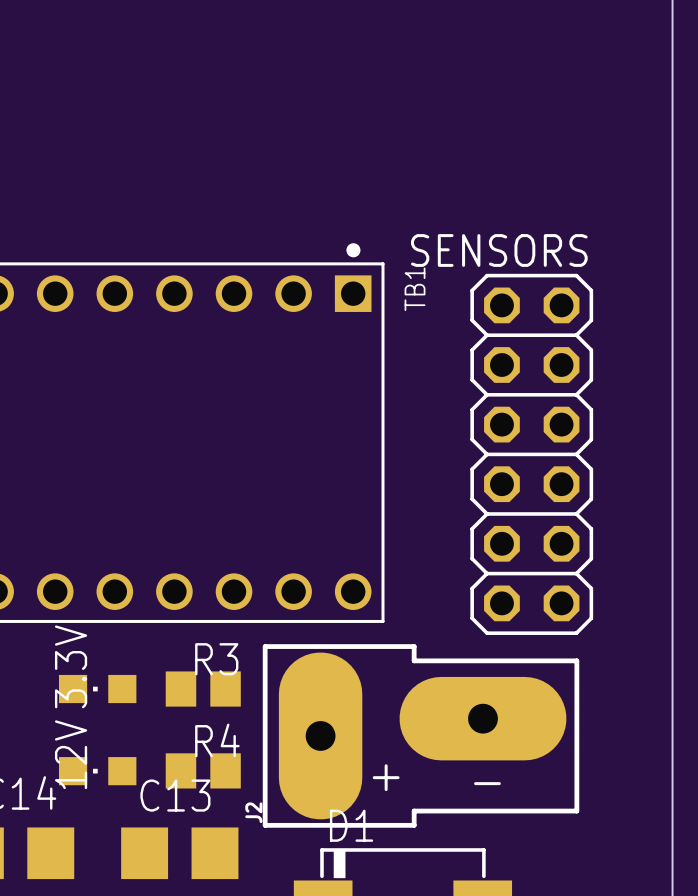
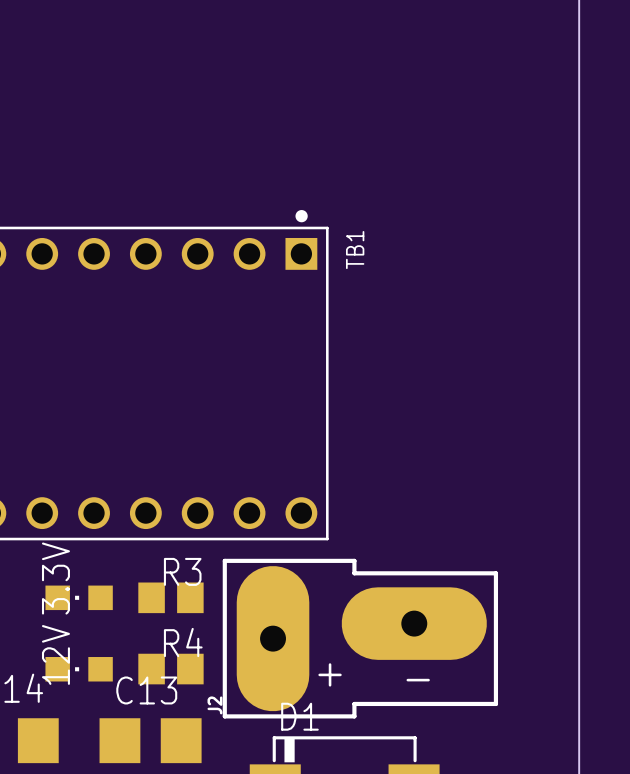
SENSORS: (531, 454) -> none

